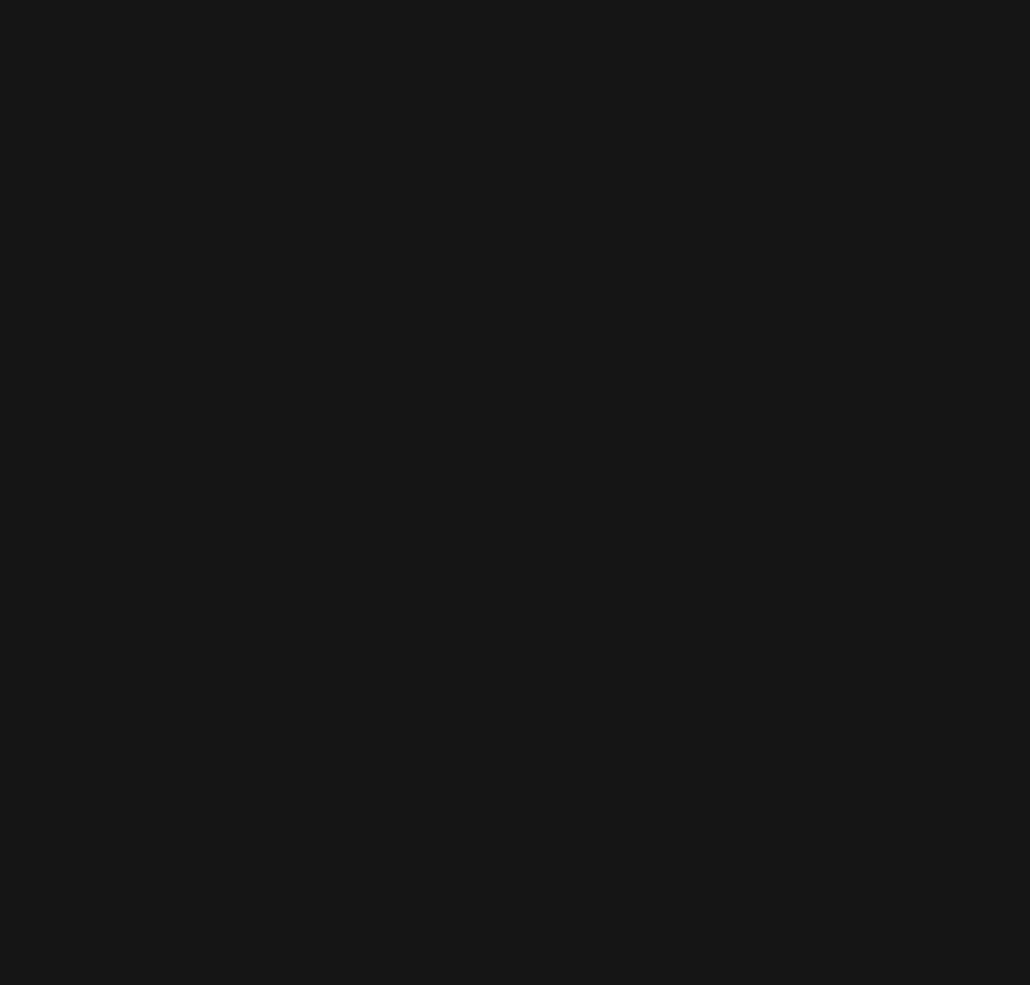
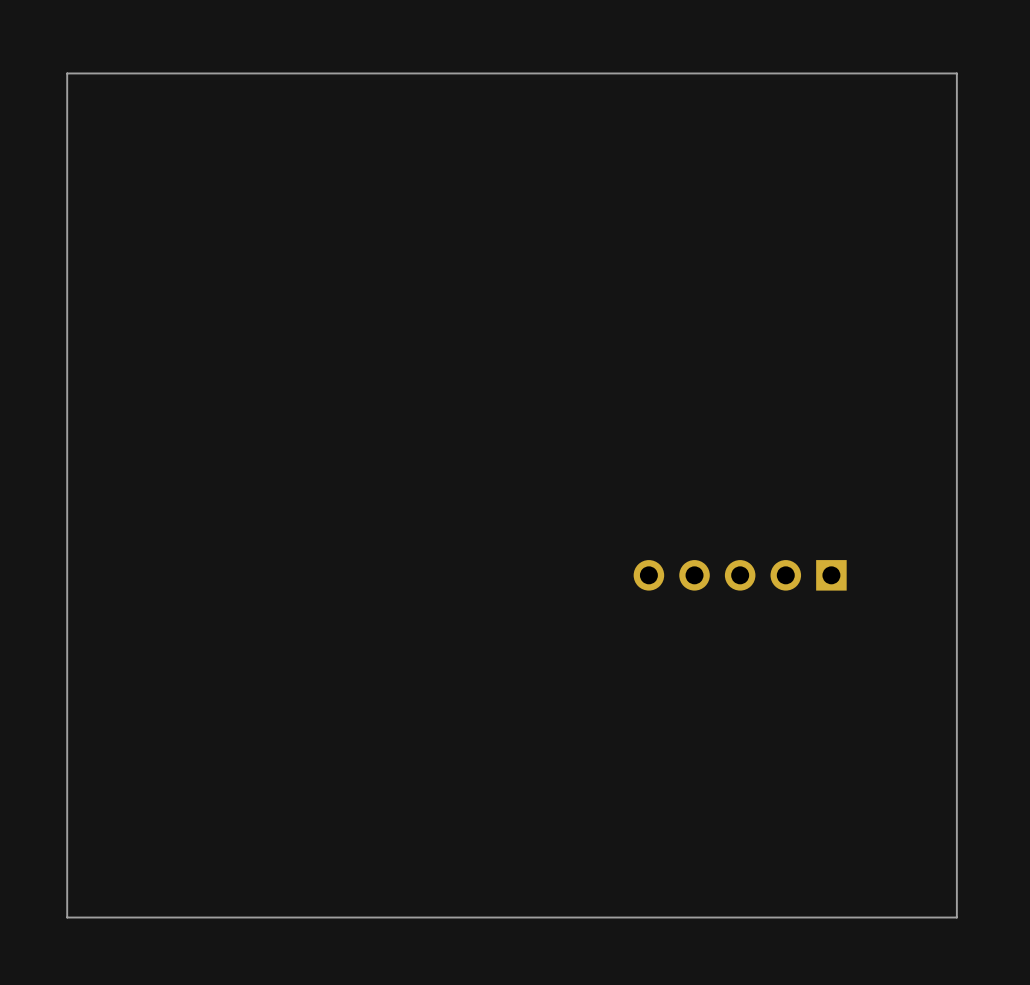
board edge: none -> (956, 73) (67, 73) (67, 917) (956, 917) (956, 73)
part: none -> (740, 575)

